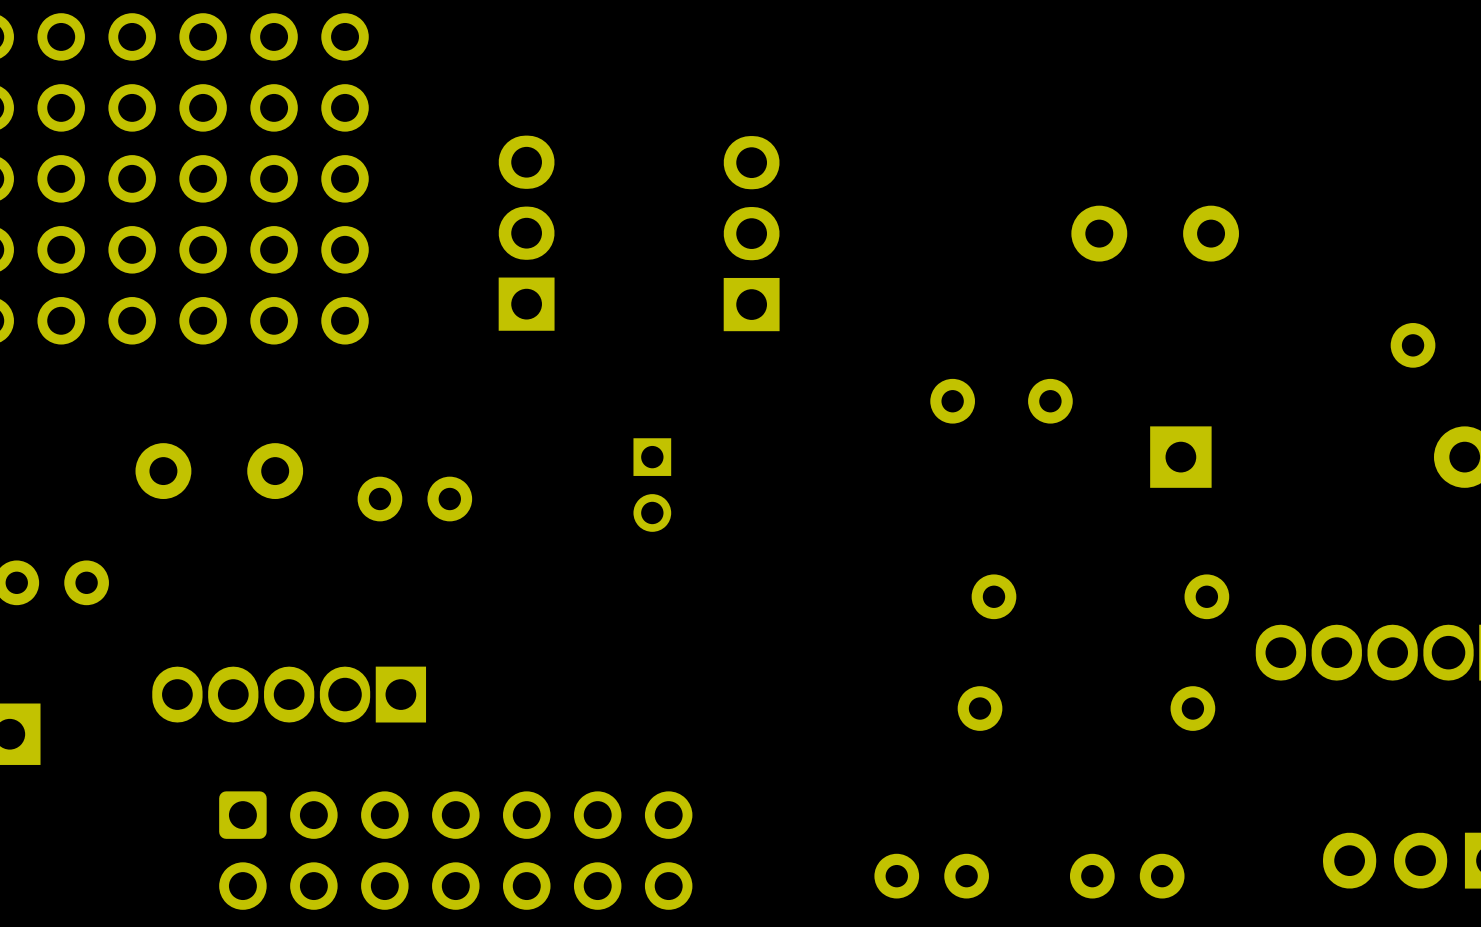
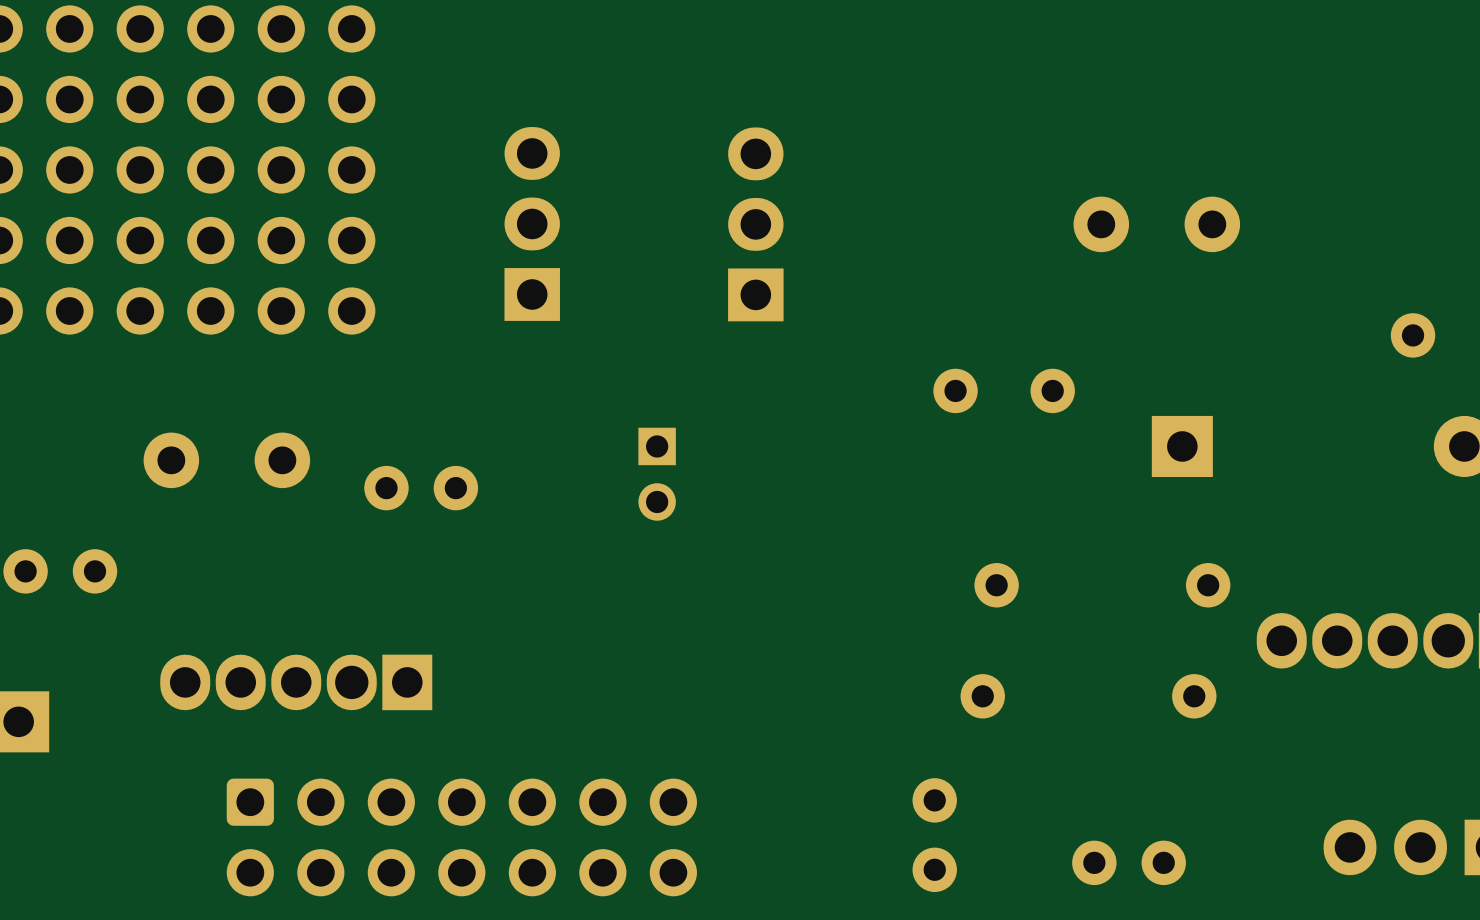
part rotation: 0° (931, 876) -> 90° clockwise (934, 835)

